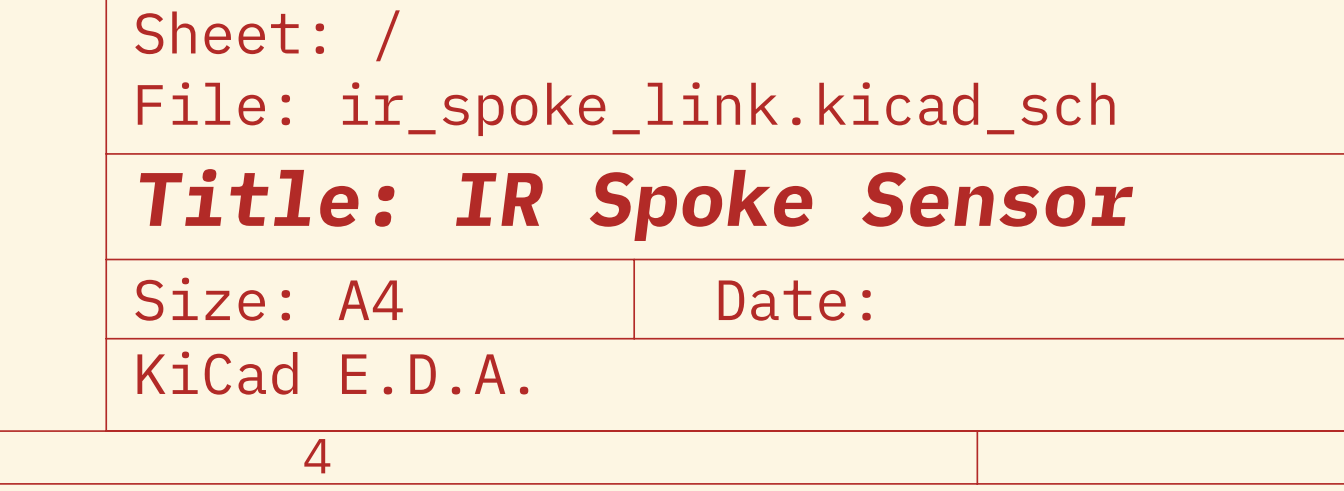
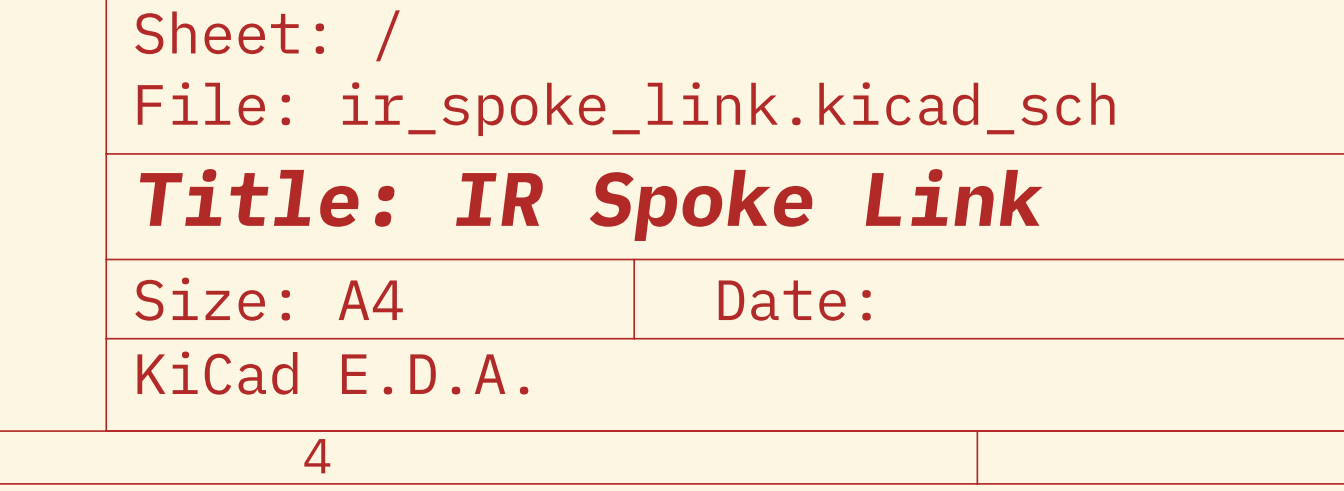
title block: Title: IR Spoke Sensor (636, 205) -> Title: IR Spoke Link (591, 205)

